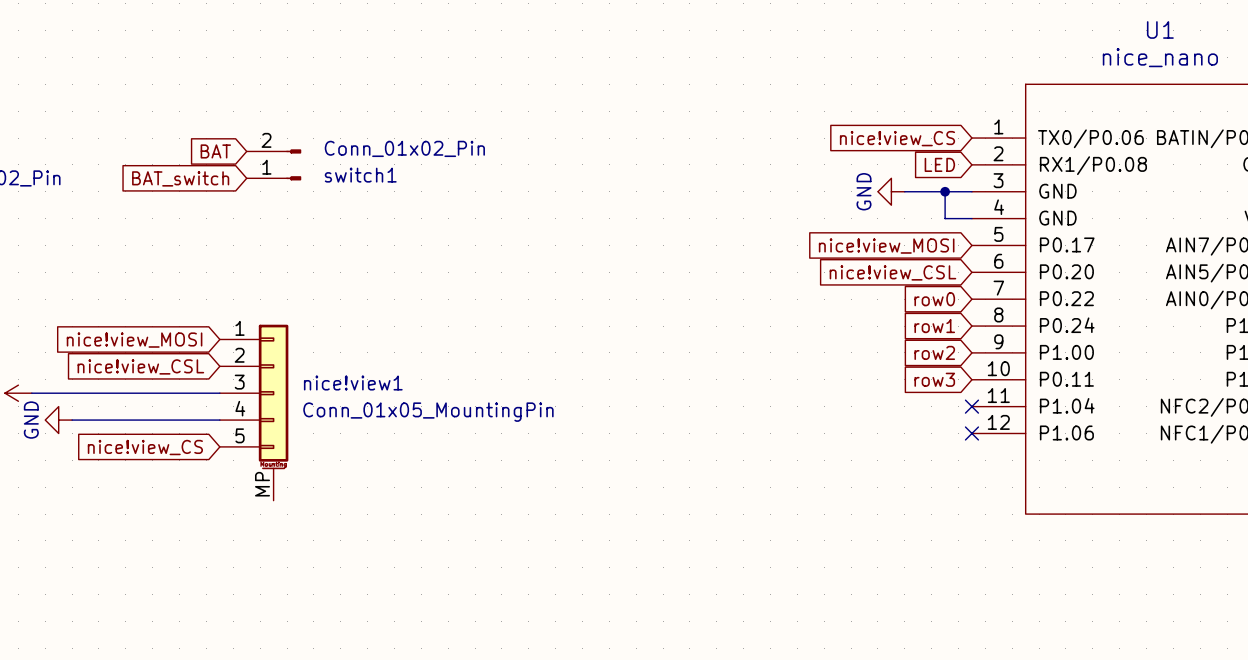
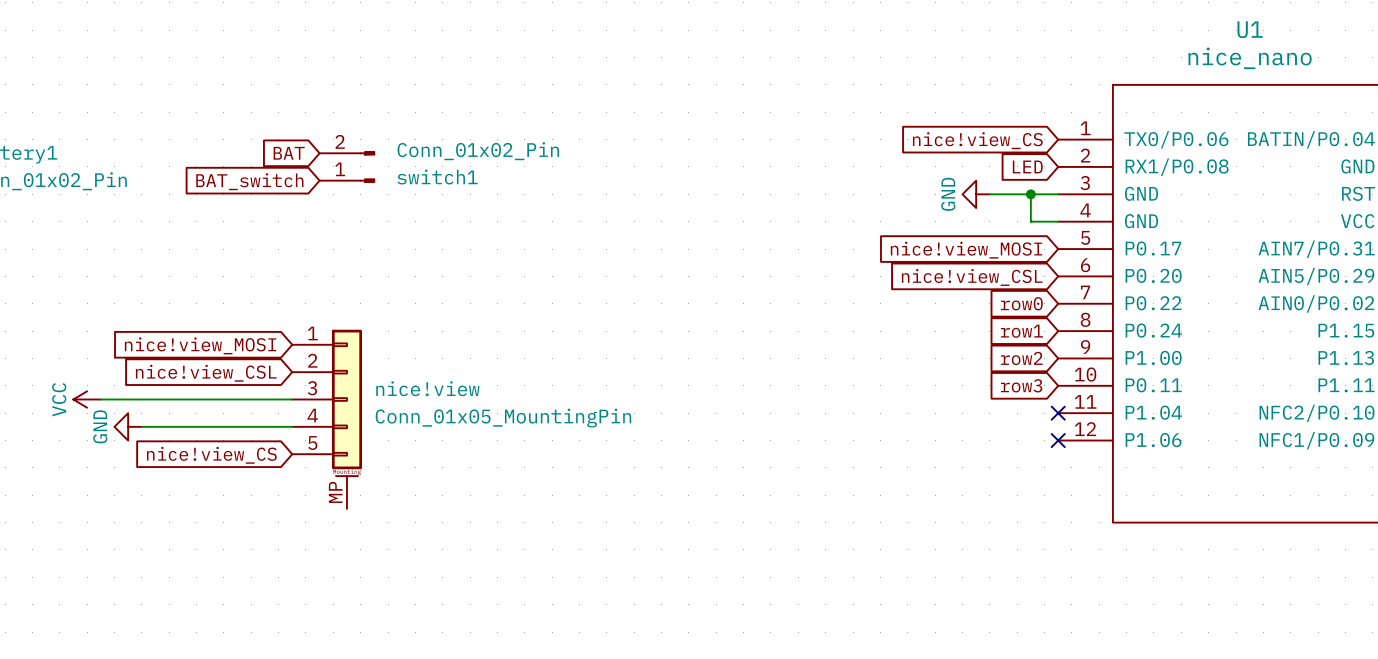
nice!view1 name: nice!view1 (353, 383) -> nice!view (427, 388)

